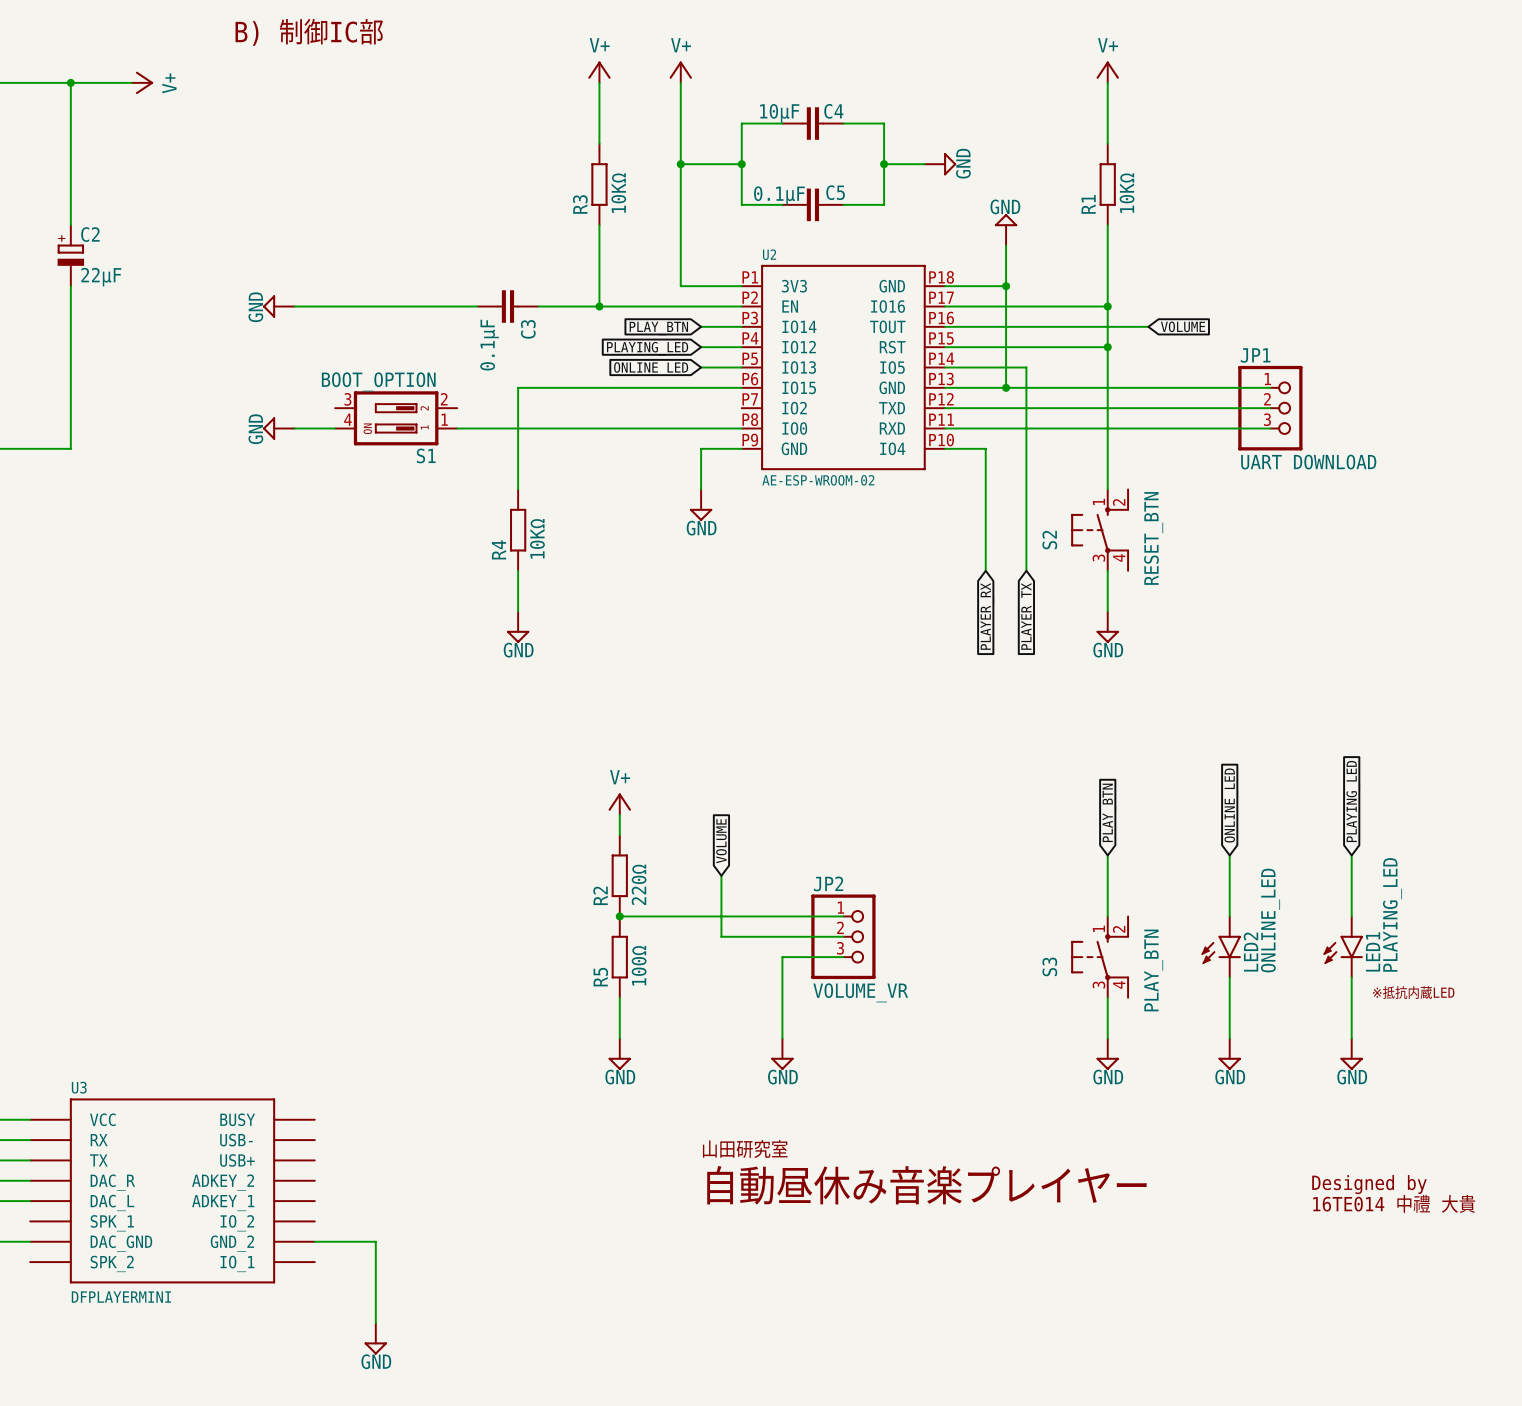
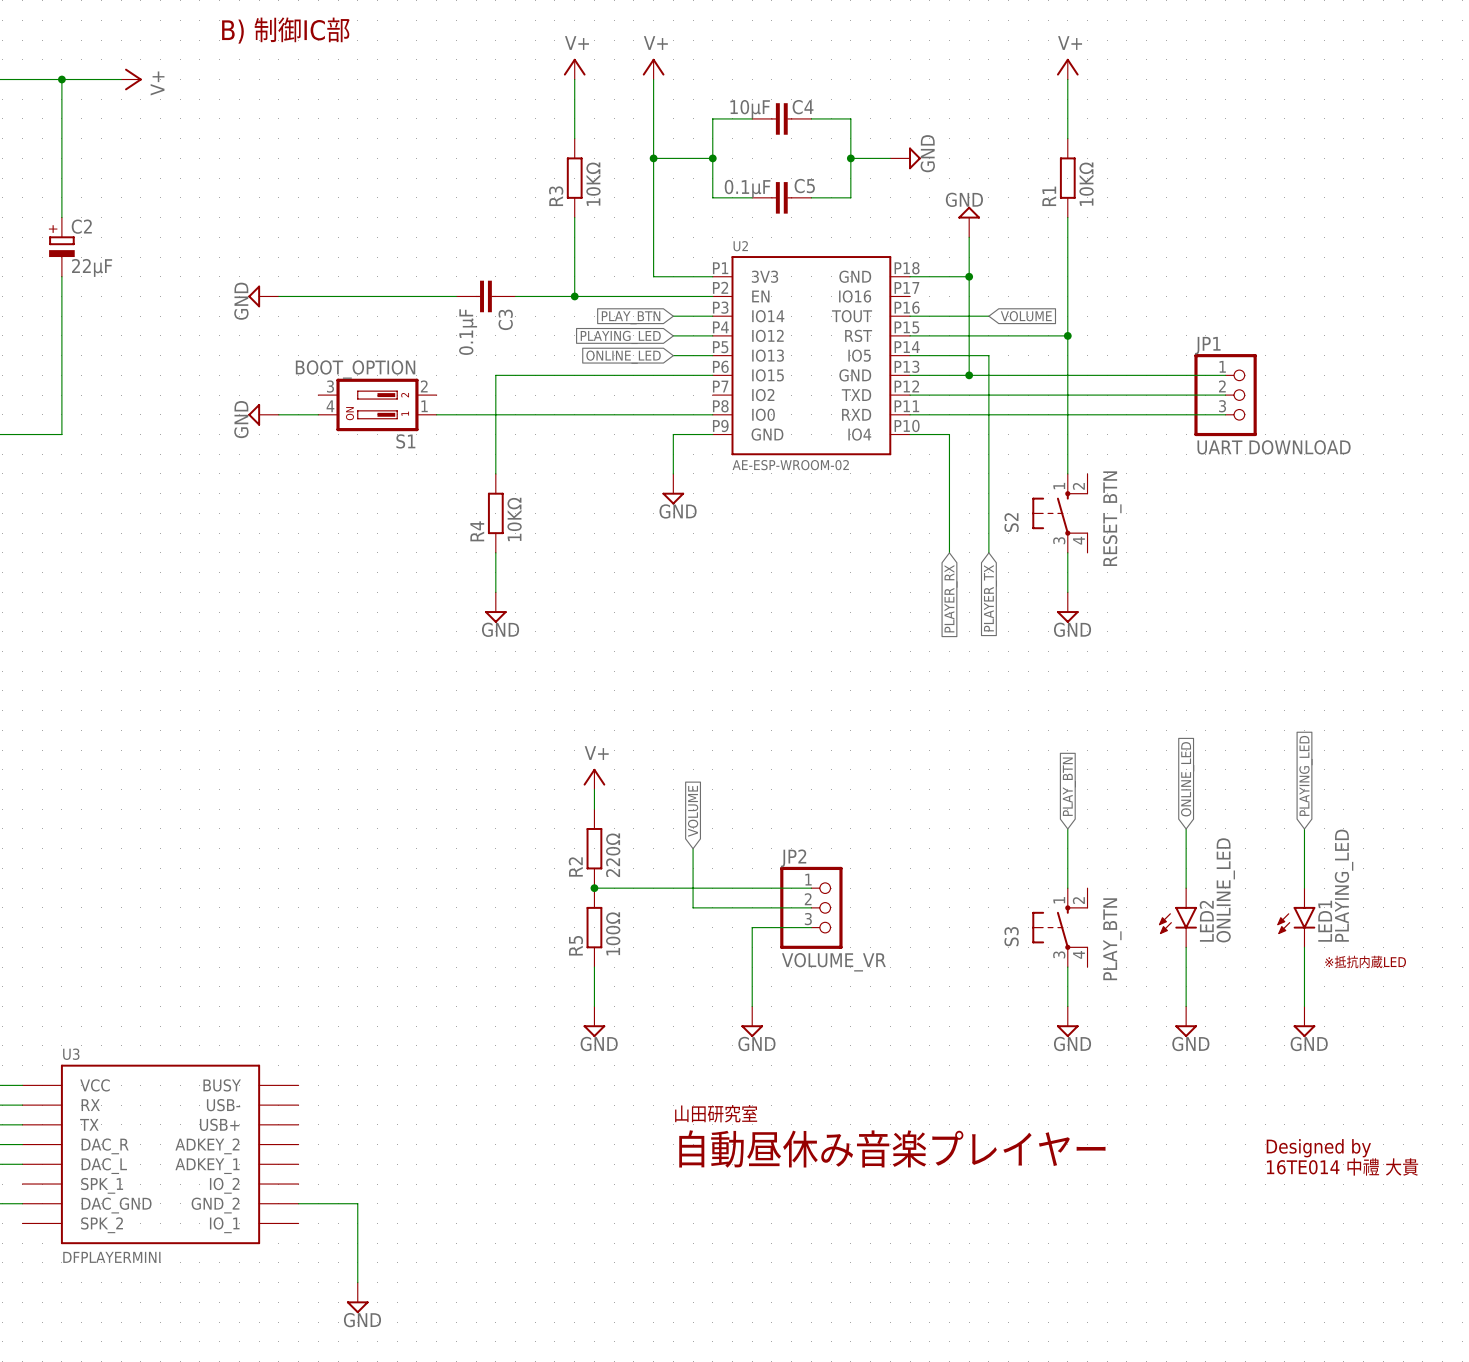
wire: (945, 306) (1107, 306) -> none
junction: (1107, 306) -> none
wire: (1026, 326) (1148, 326) -> none
global label position: VOLUME (1183, 326) -> VOLUME (1026, 316)

